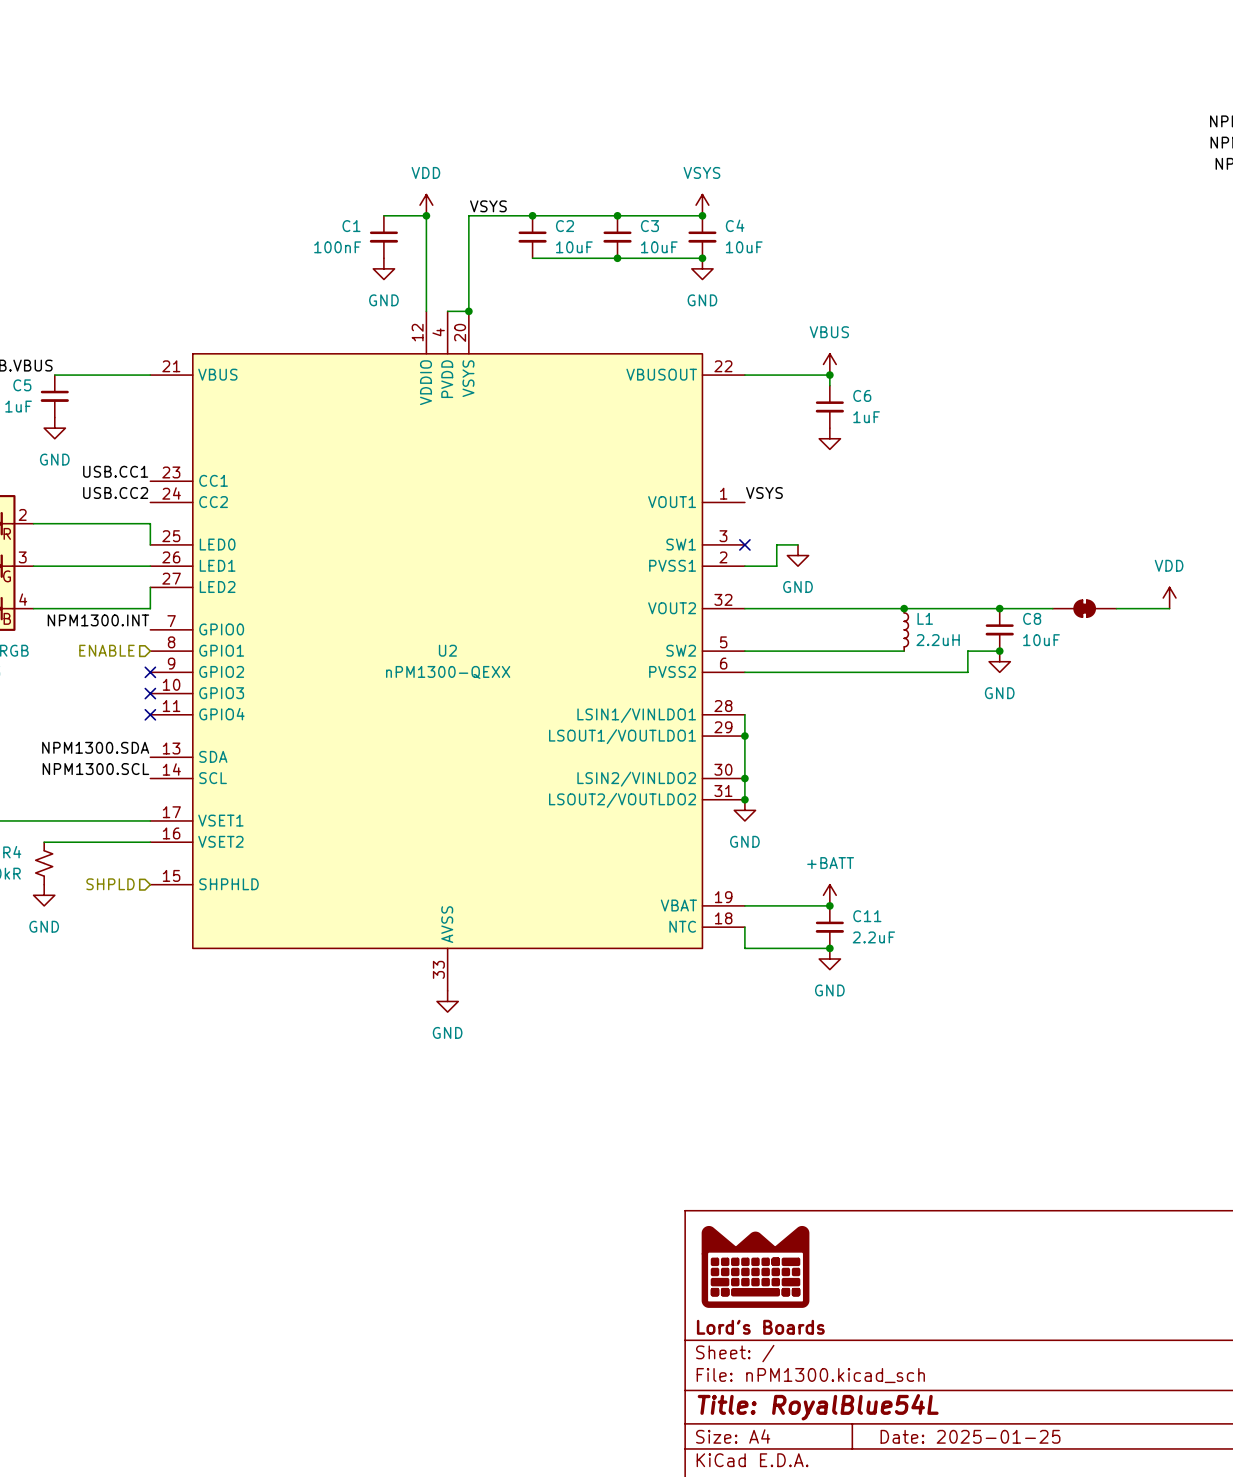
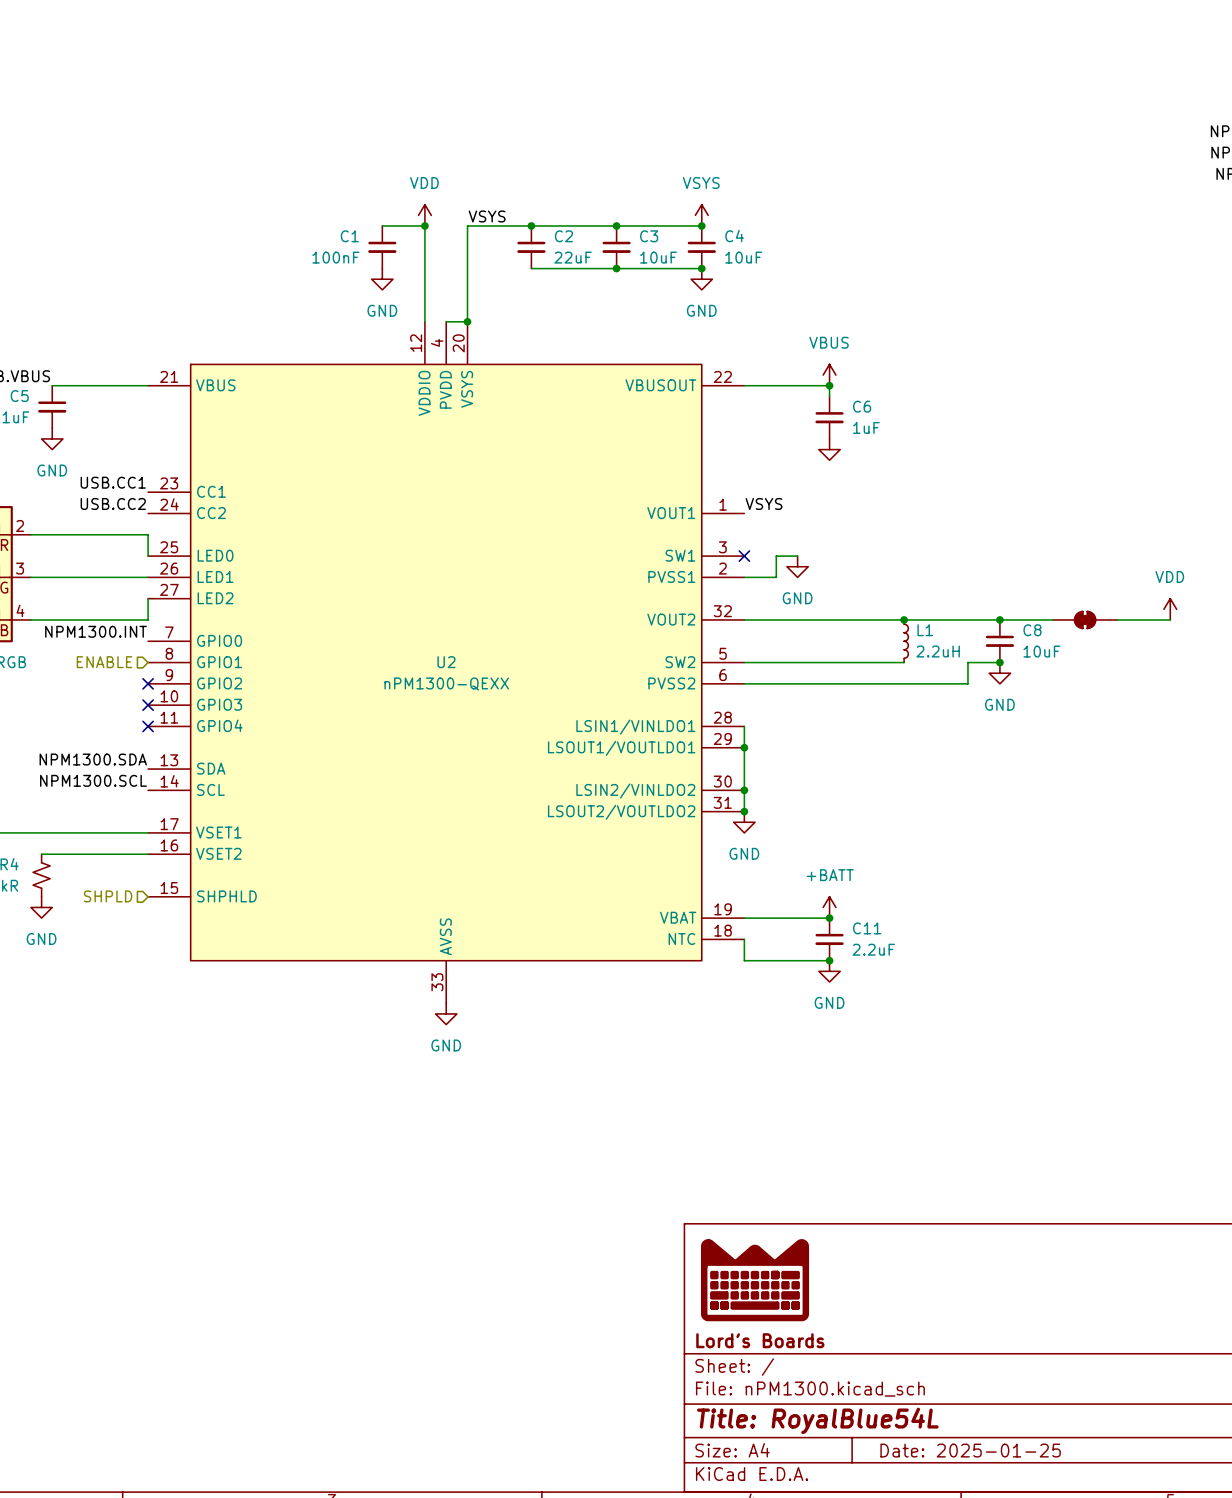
C2 value: 10uF (574, 247) -> 22uF (573, 257)

